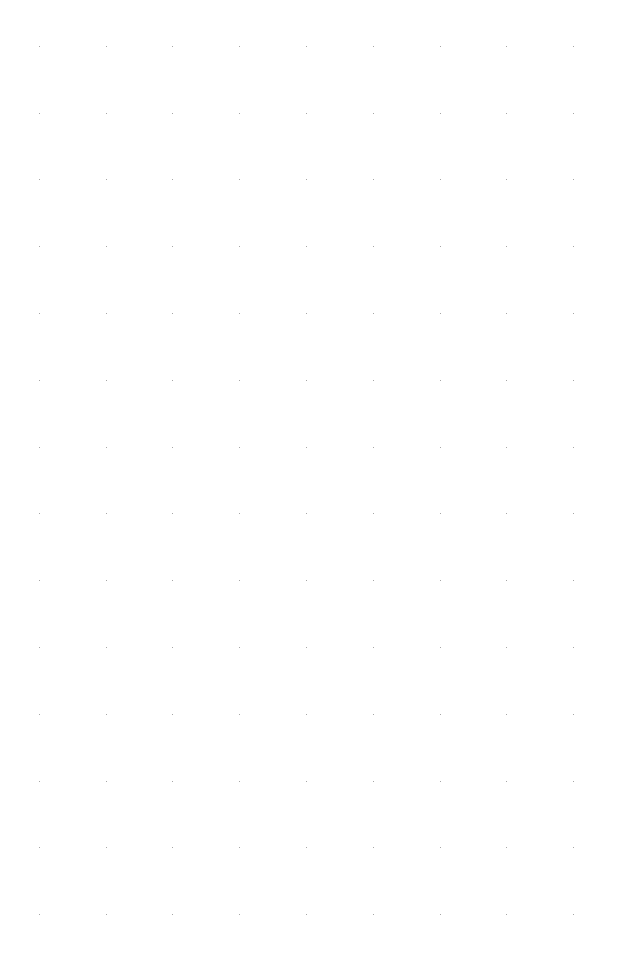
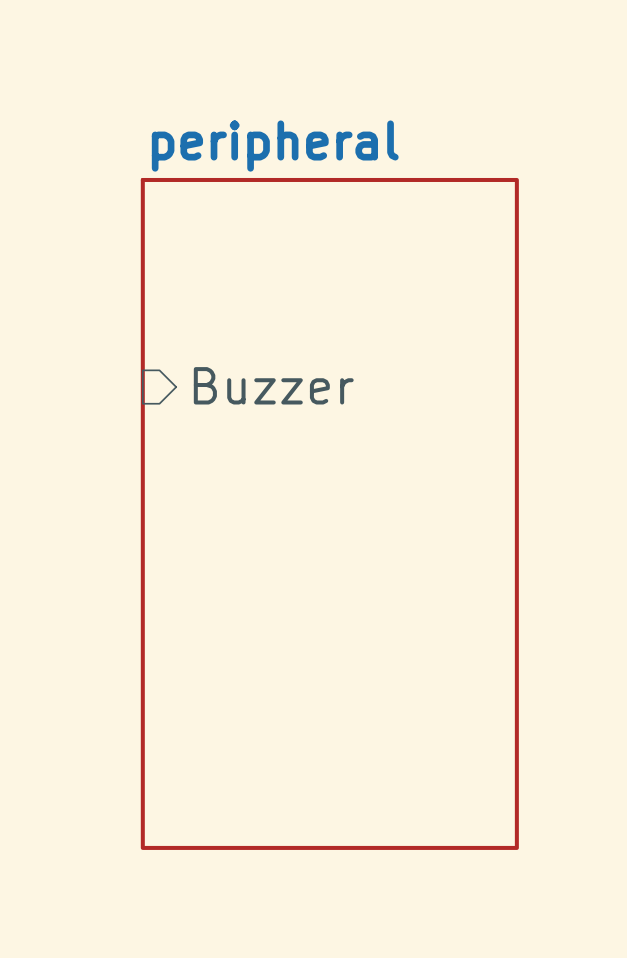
sheet pin: none -> Buzzer (273, 385)
sheet peripheral: none -> (329, 513)

